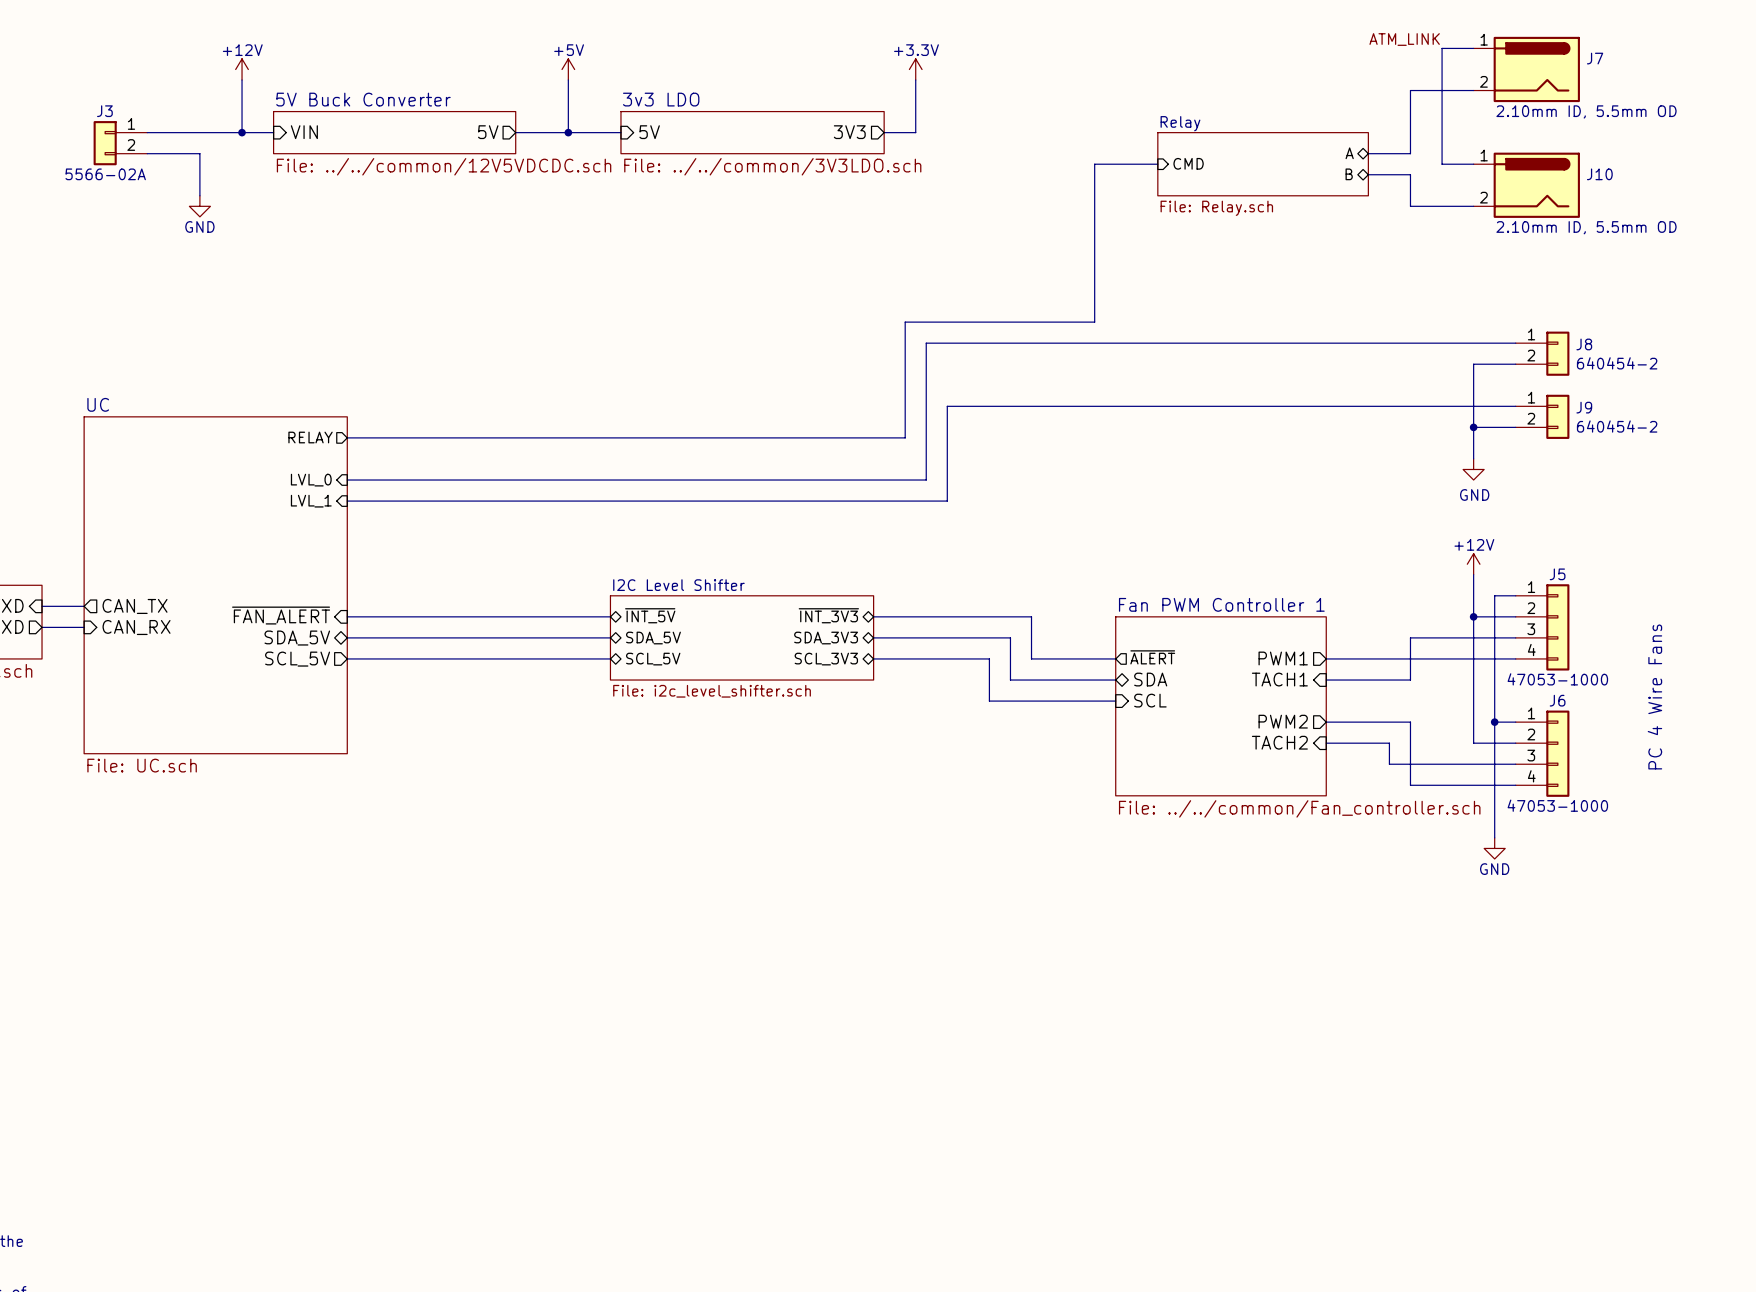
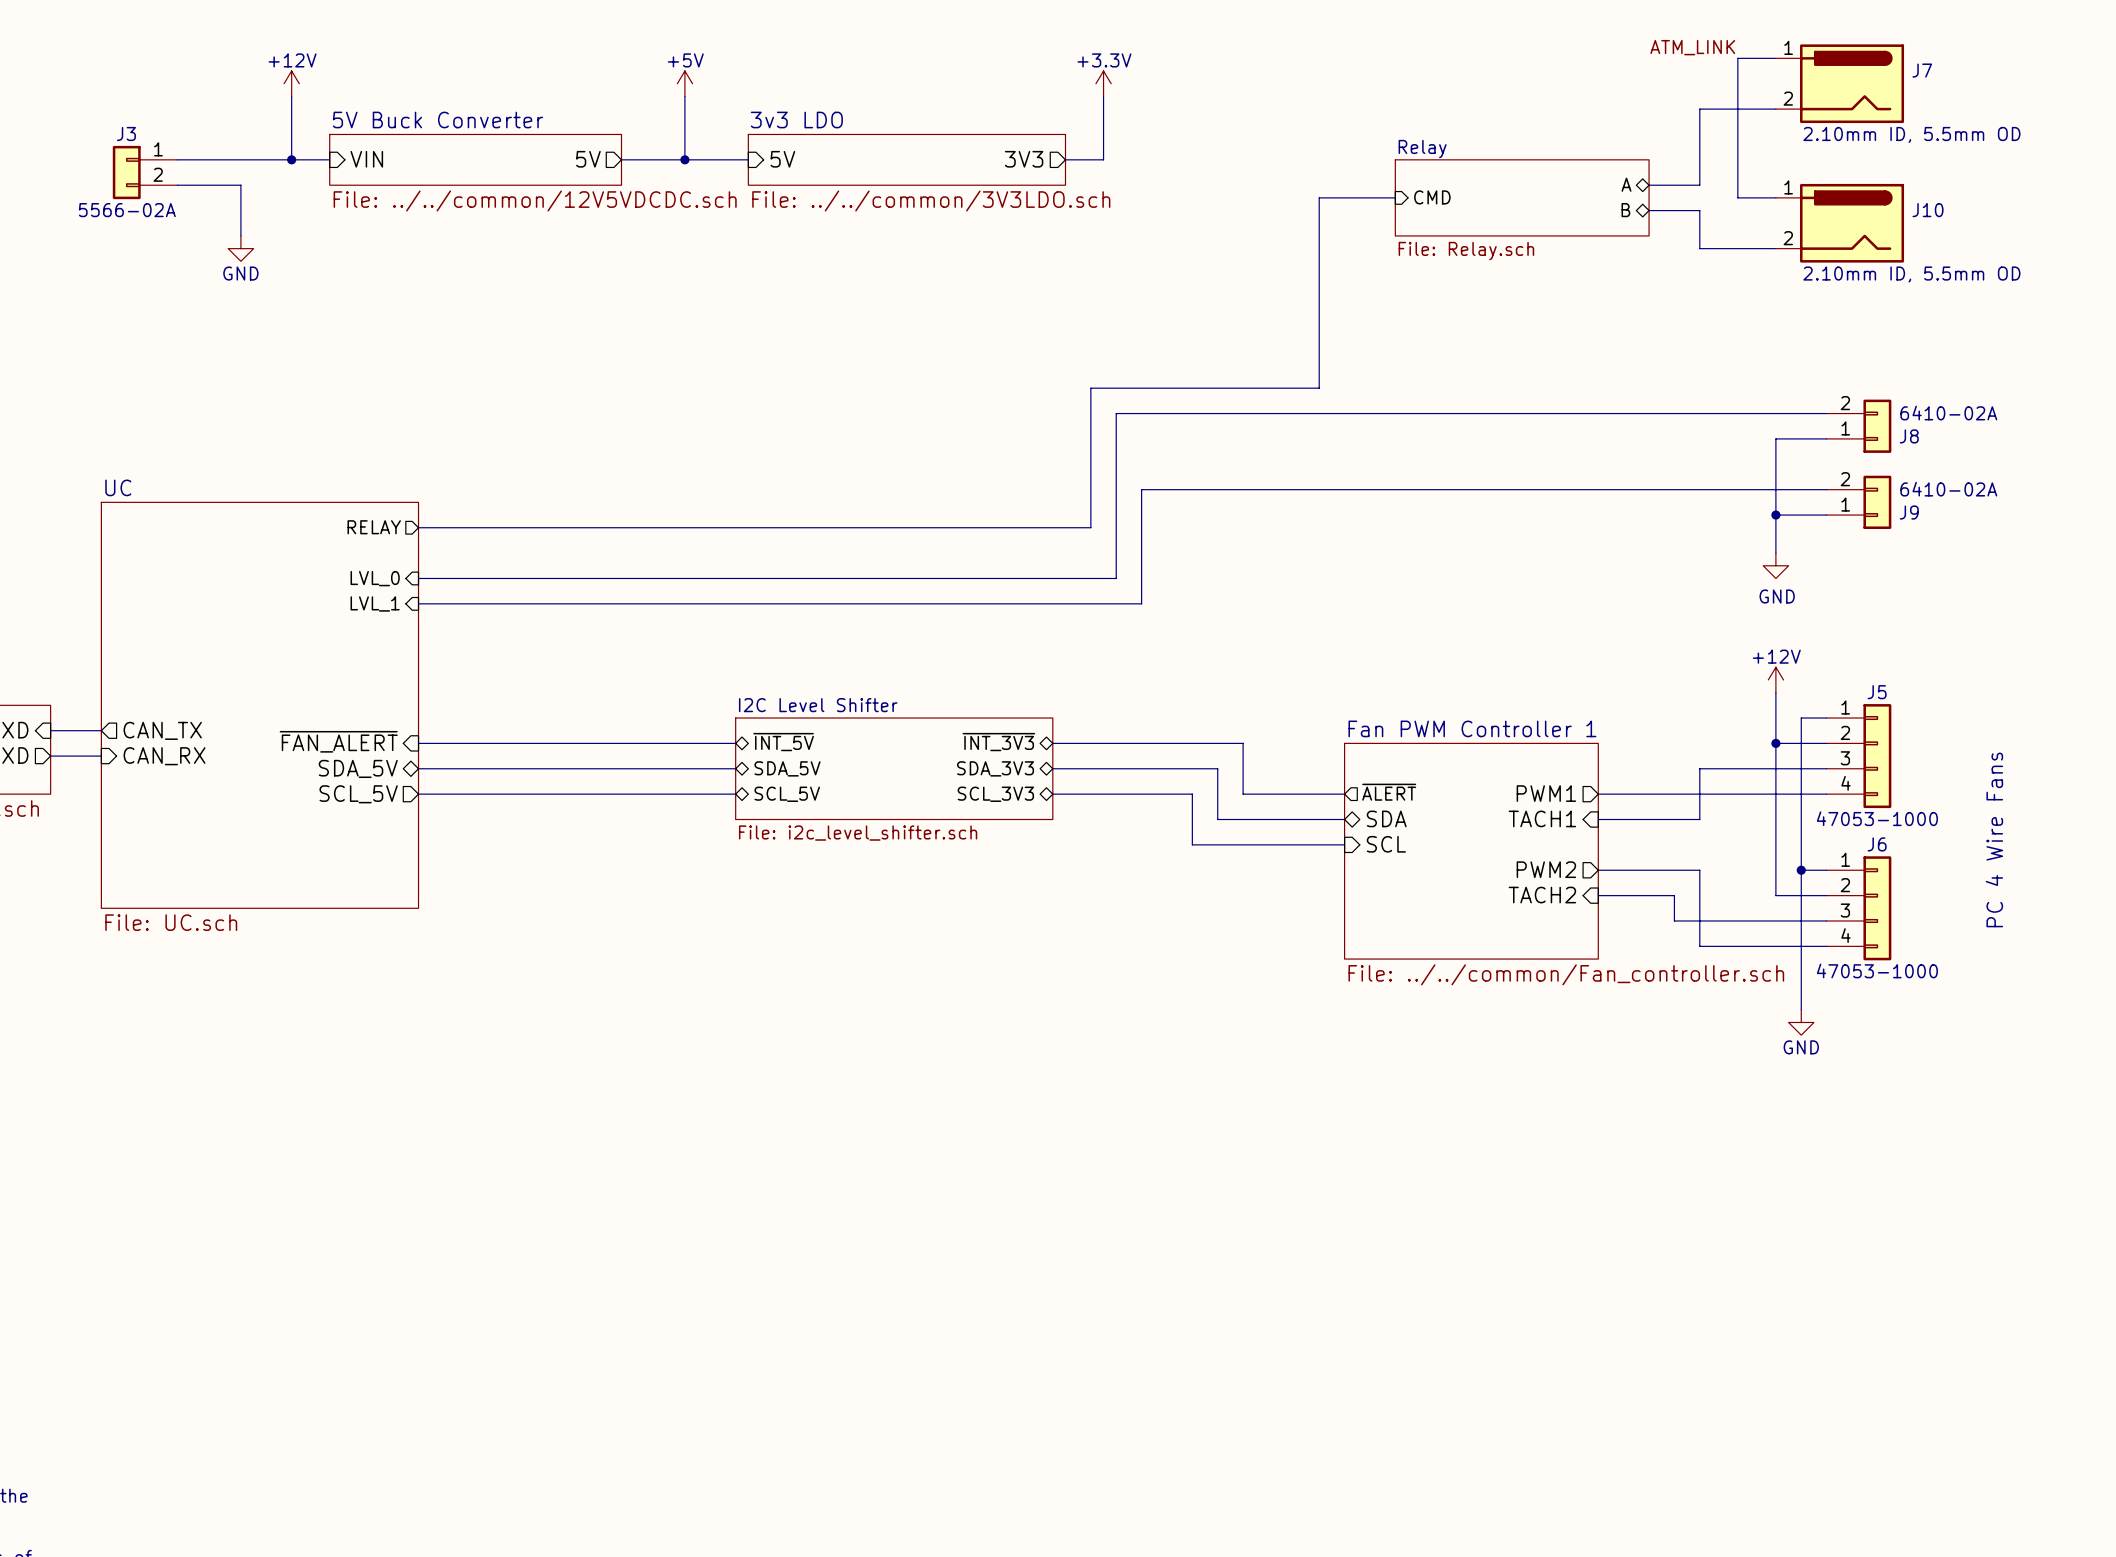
J8 flip: as is (1557, 353) -> up-down (1877, 426)
J8 value: 640454-2 (1617, 363) -> 6410-02A (1948, 413)
J9 flip: as is (1557, 416) -> up-down (1877, 502)
J9 value: 640454-2 (1617, 426) -> 6410-02A (1948, 489)

